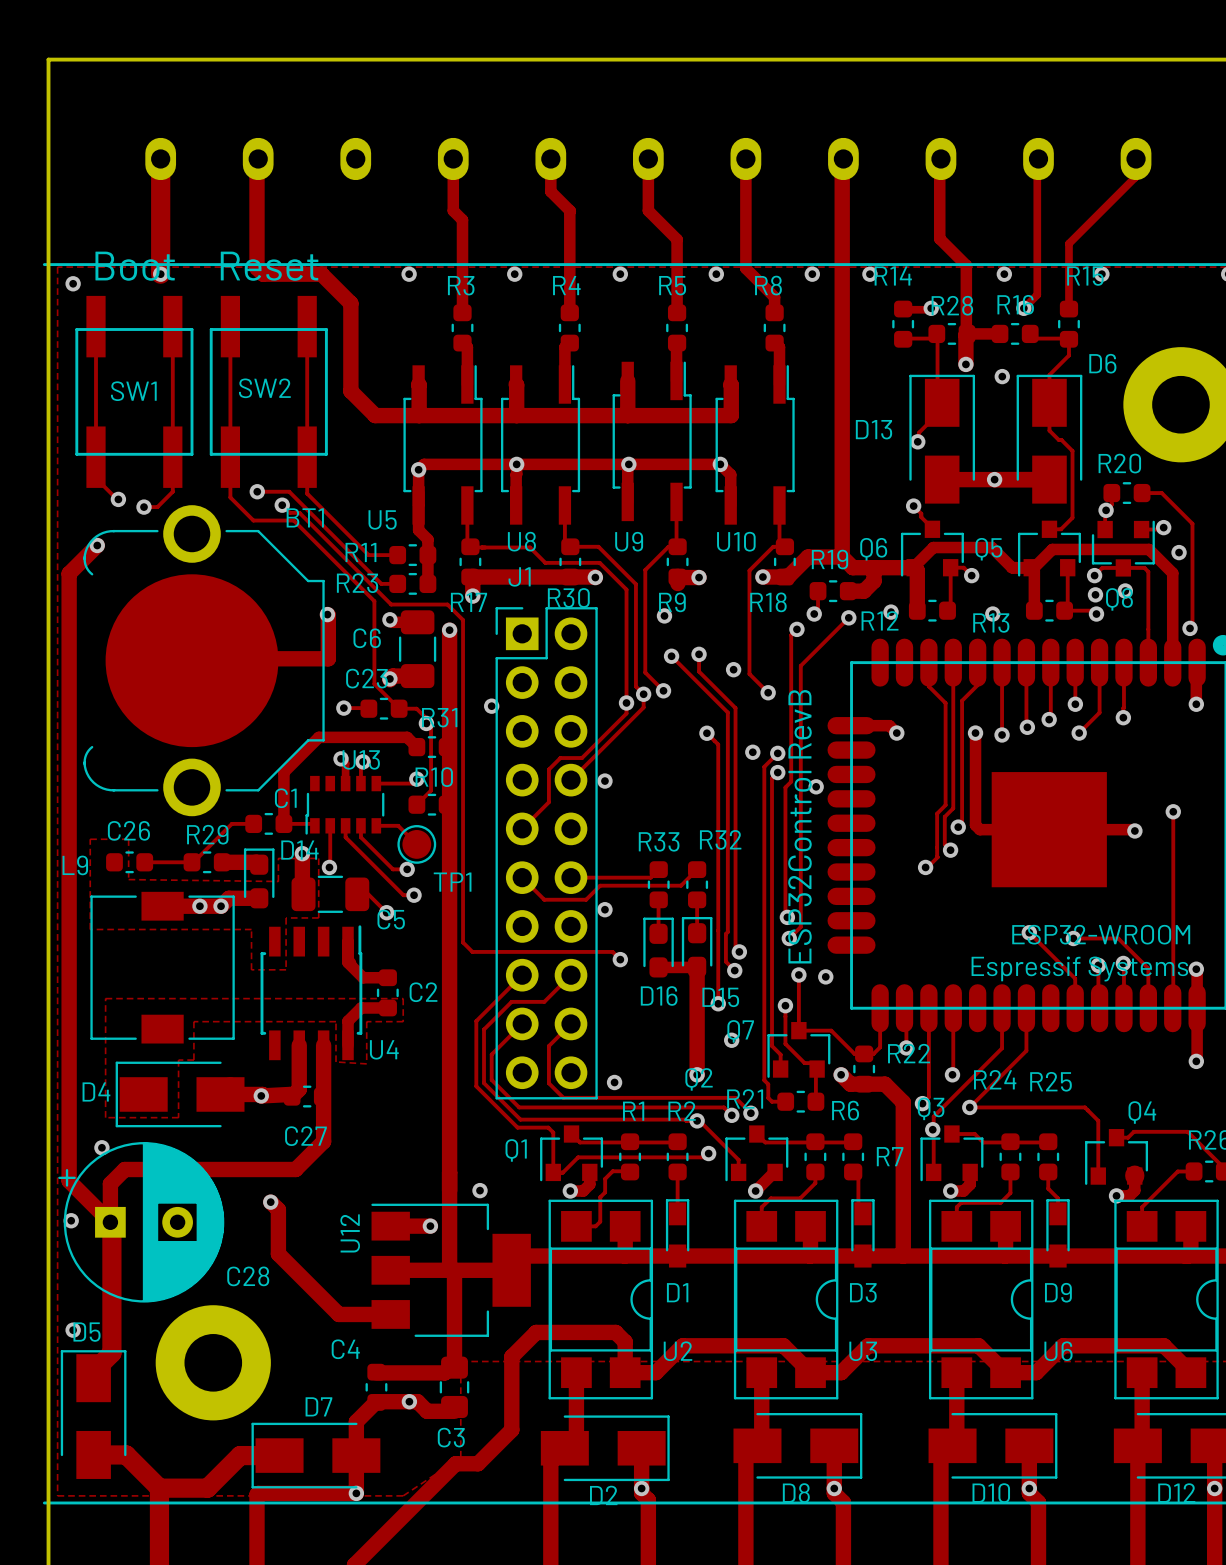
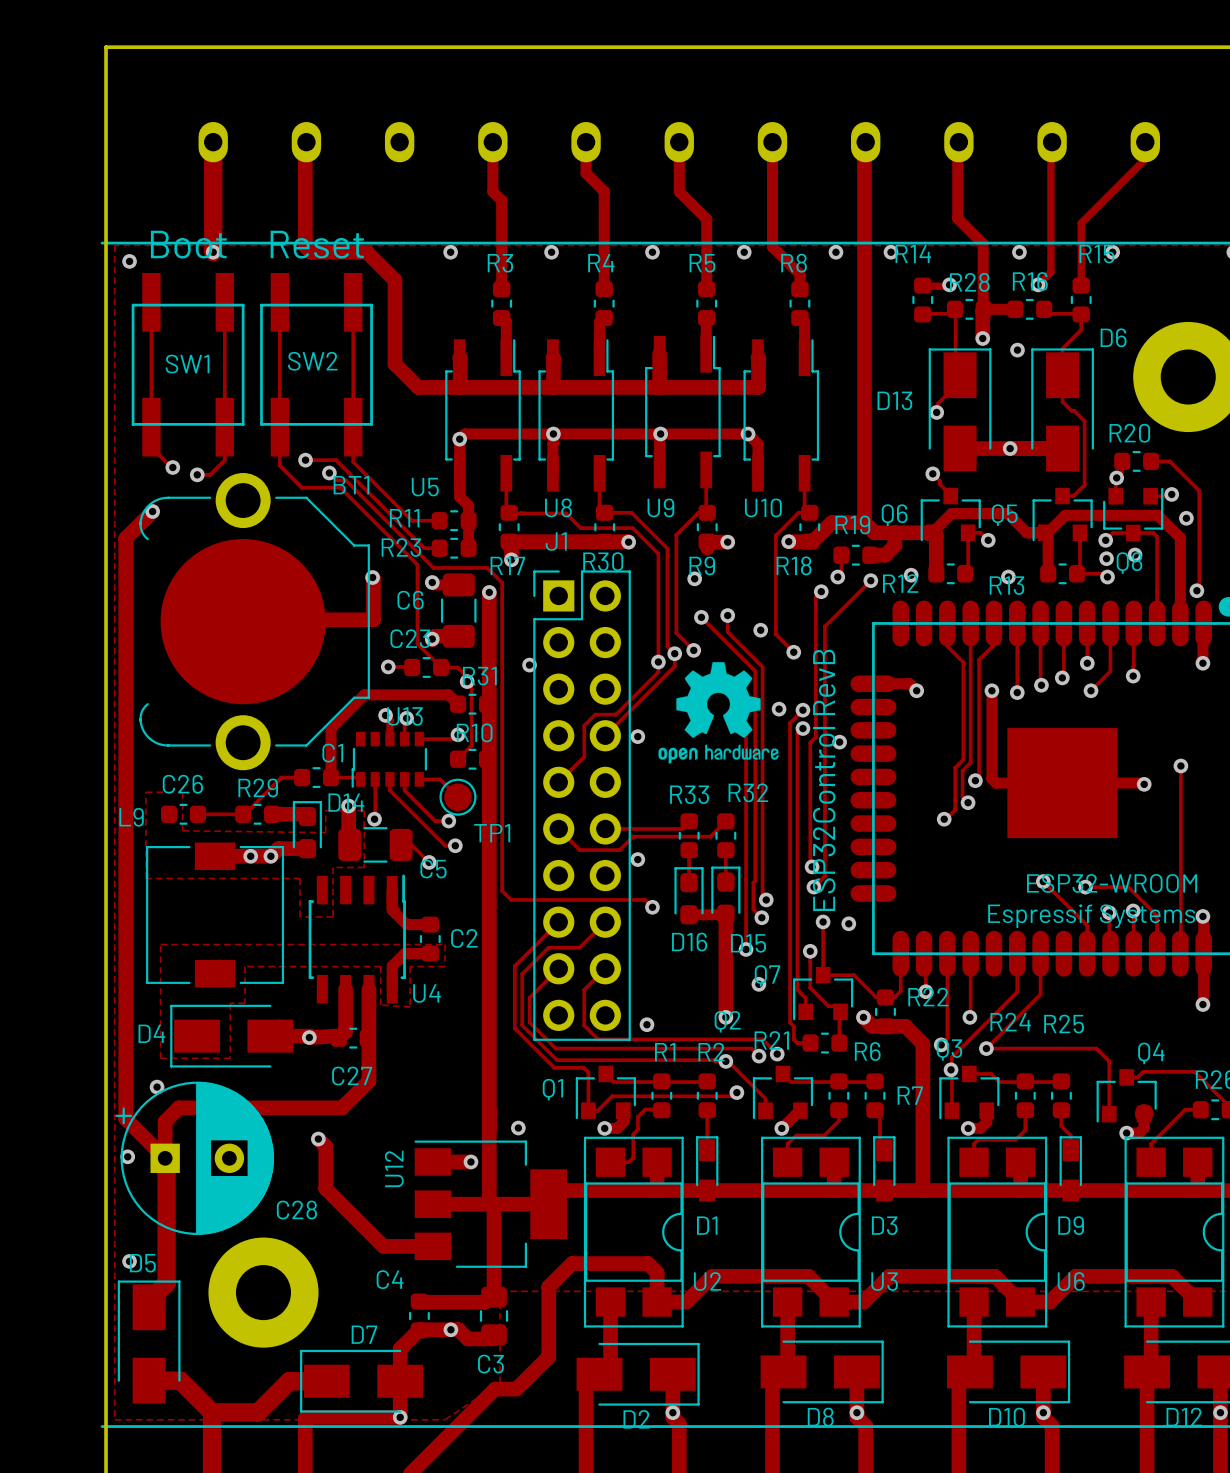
drawing: none -> [658, 662, 779, 764]

